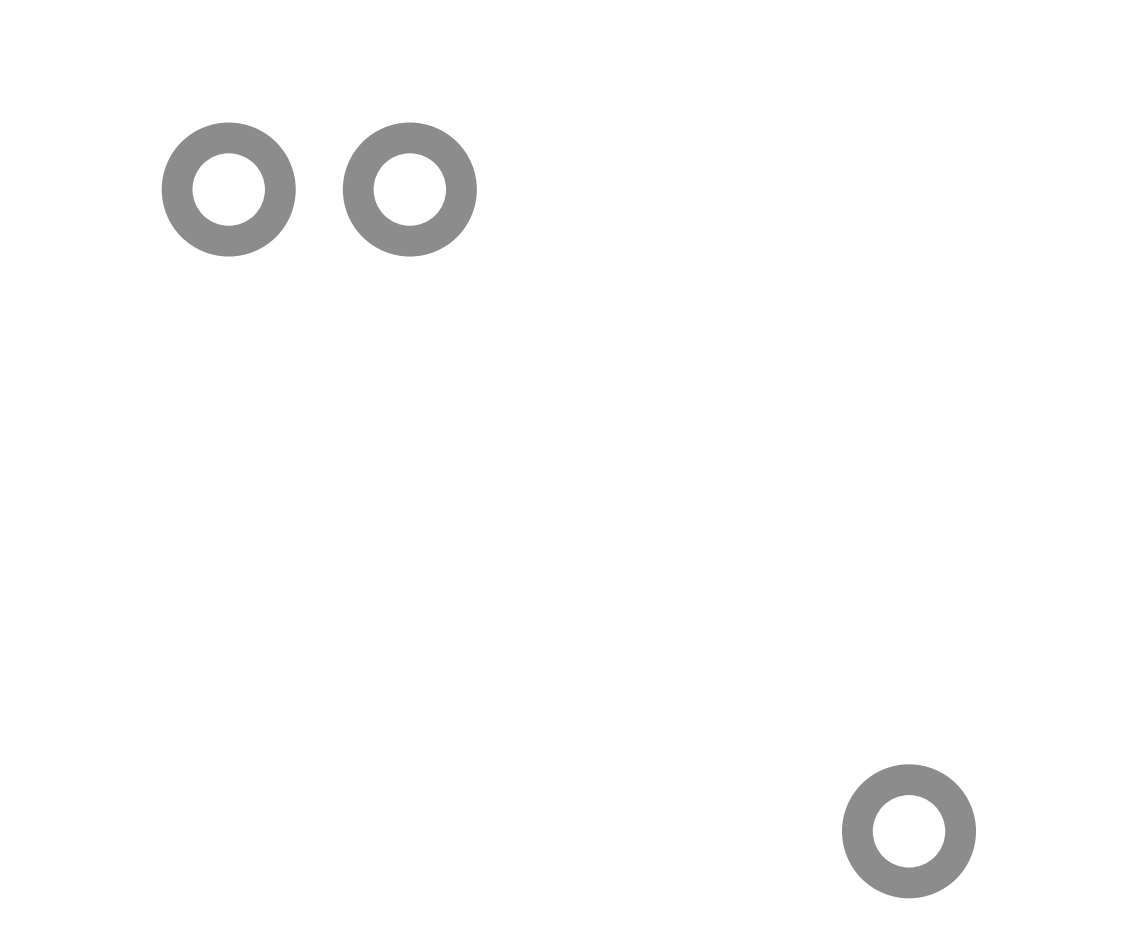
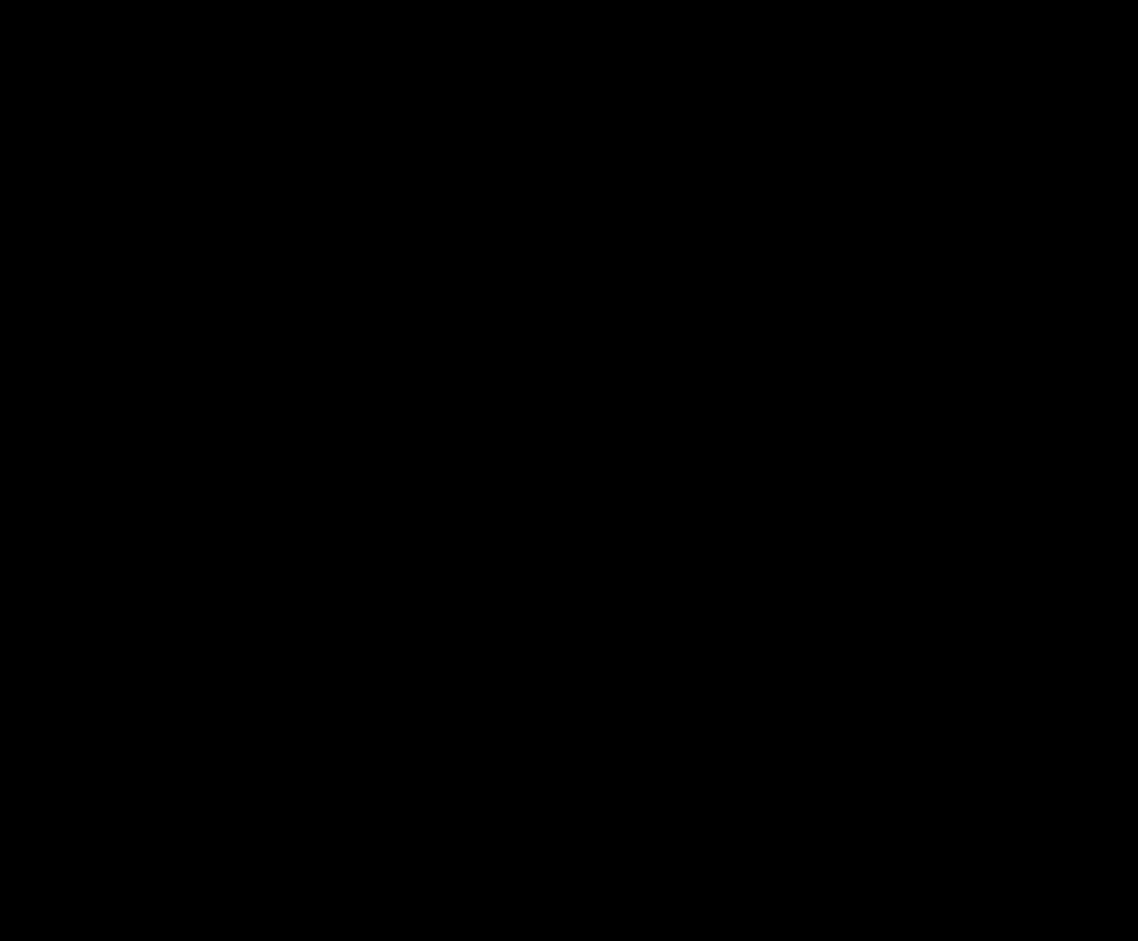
part: (319, 189) -> none
part: (909, 831) -> none

